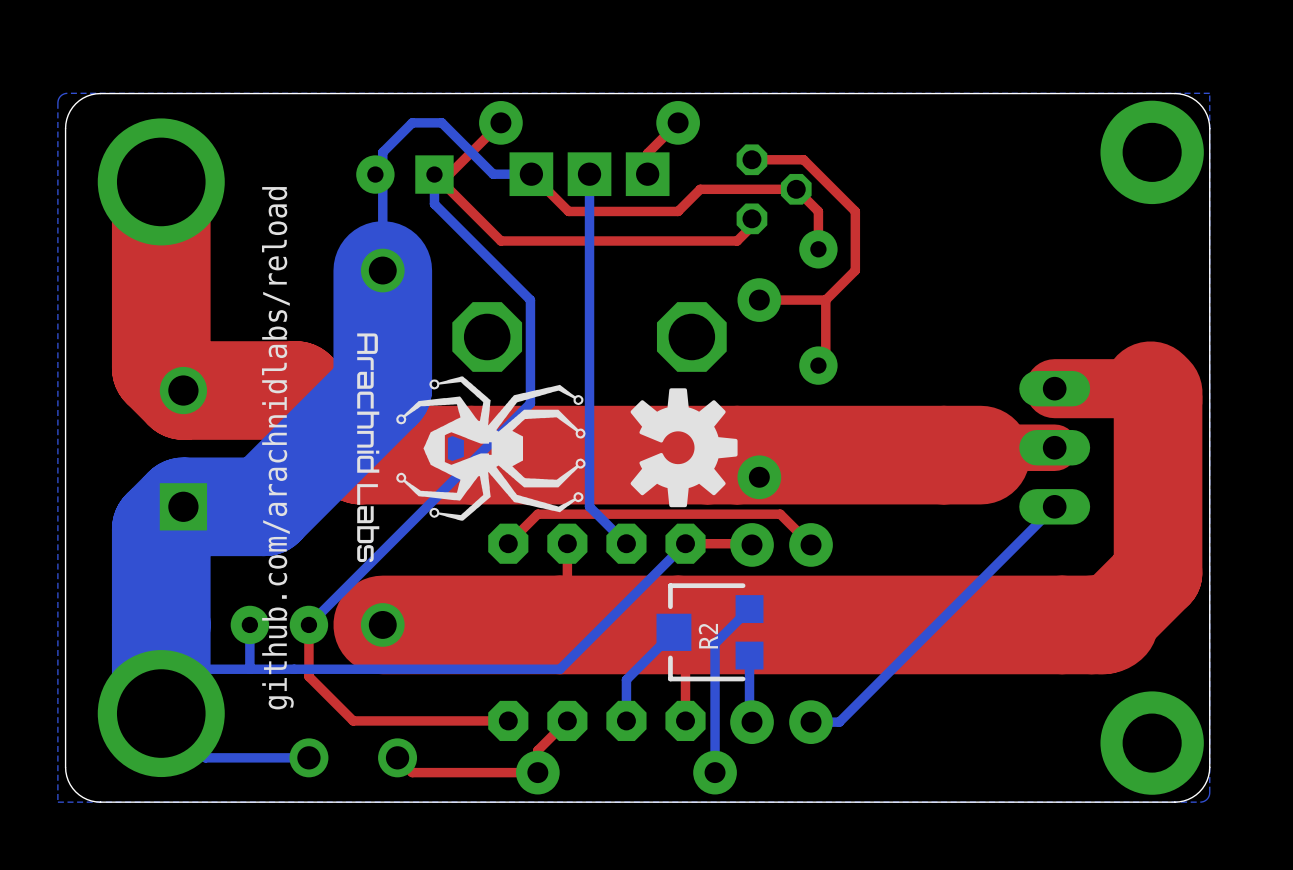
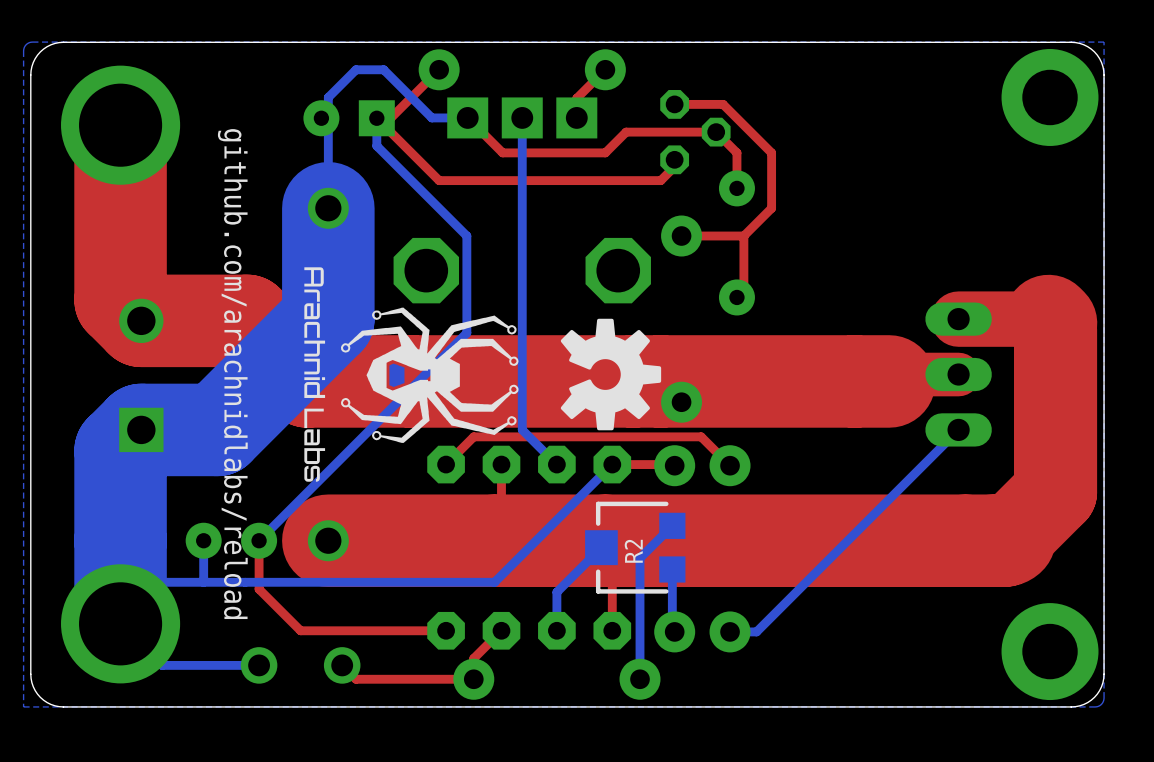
text rotation: 0° (277, 448) -> 180° (232, 374)

